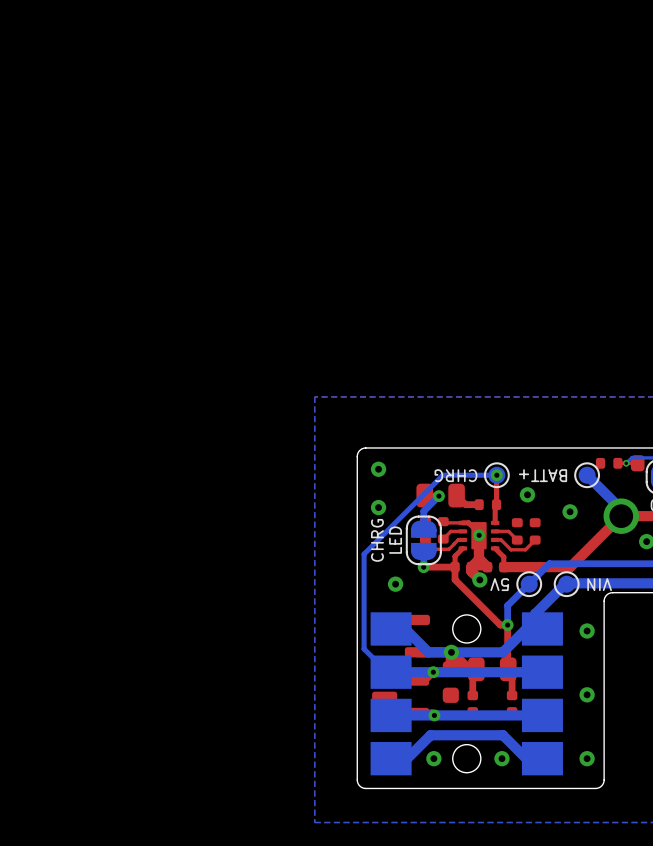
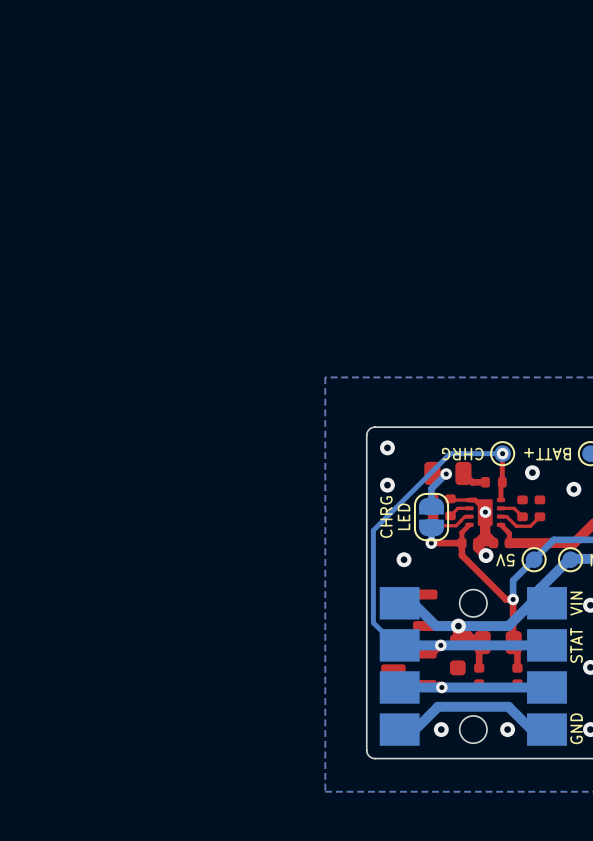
text: none -> VIN (576, 603)
text: none -> STAT (576, 645)
text: none -> GND (576, 728)

